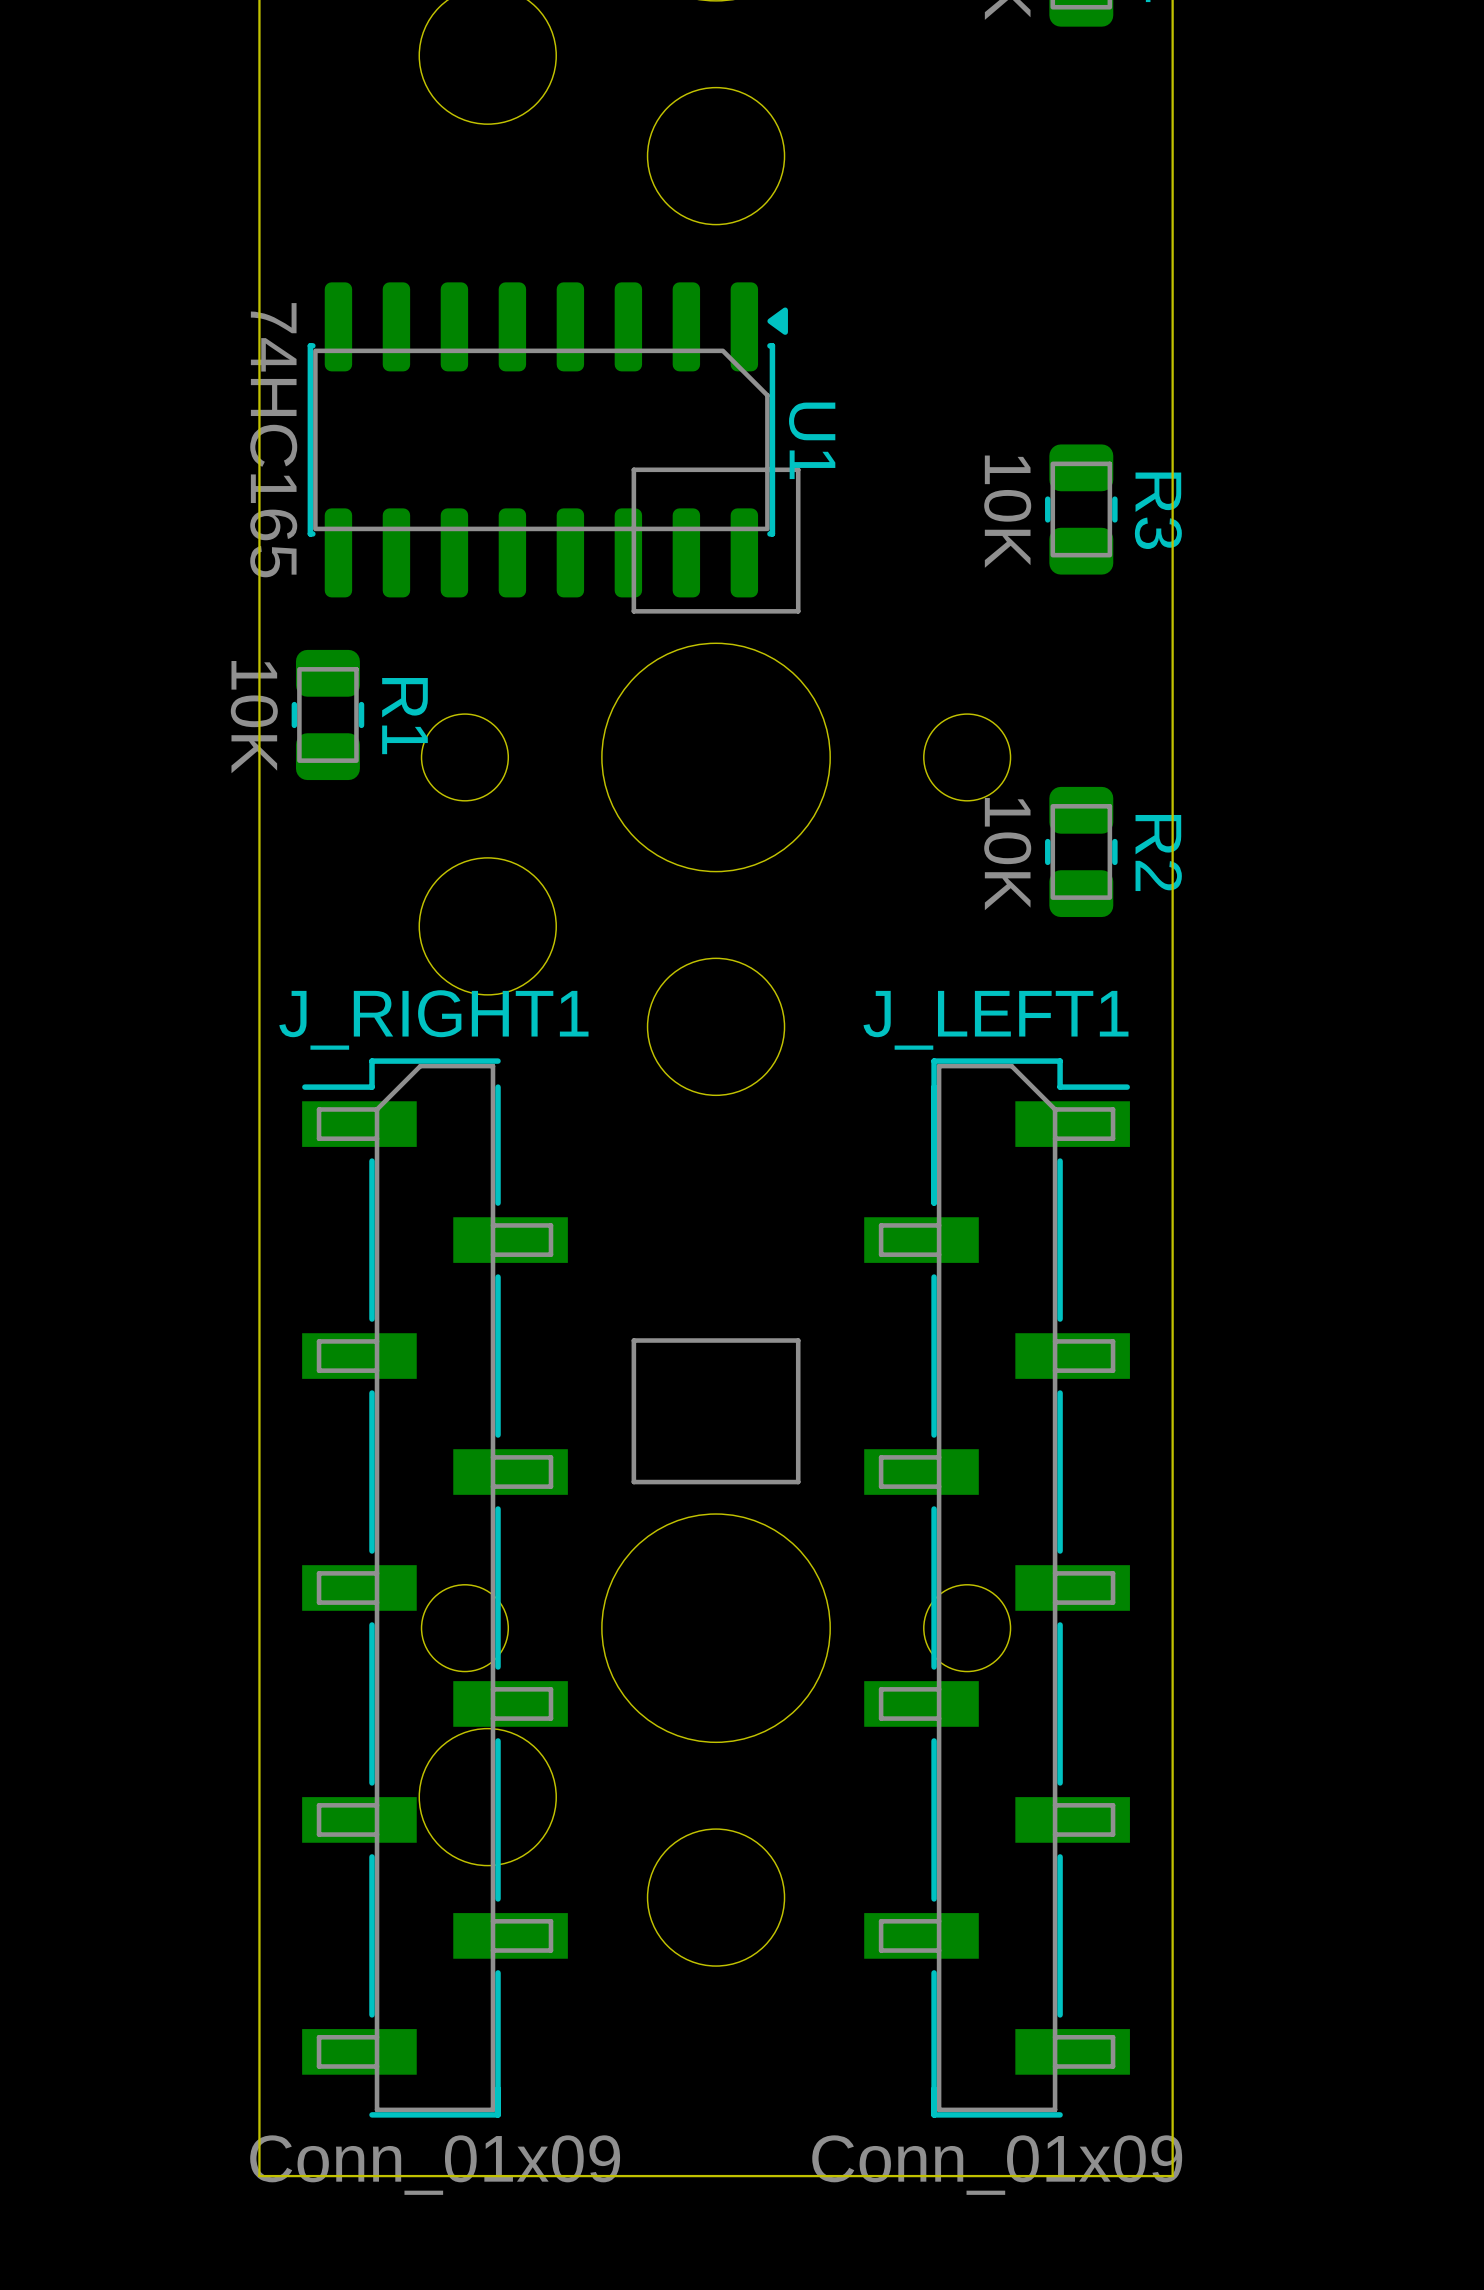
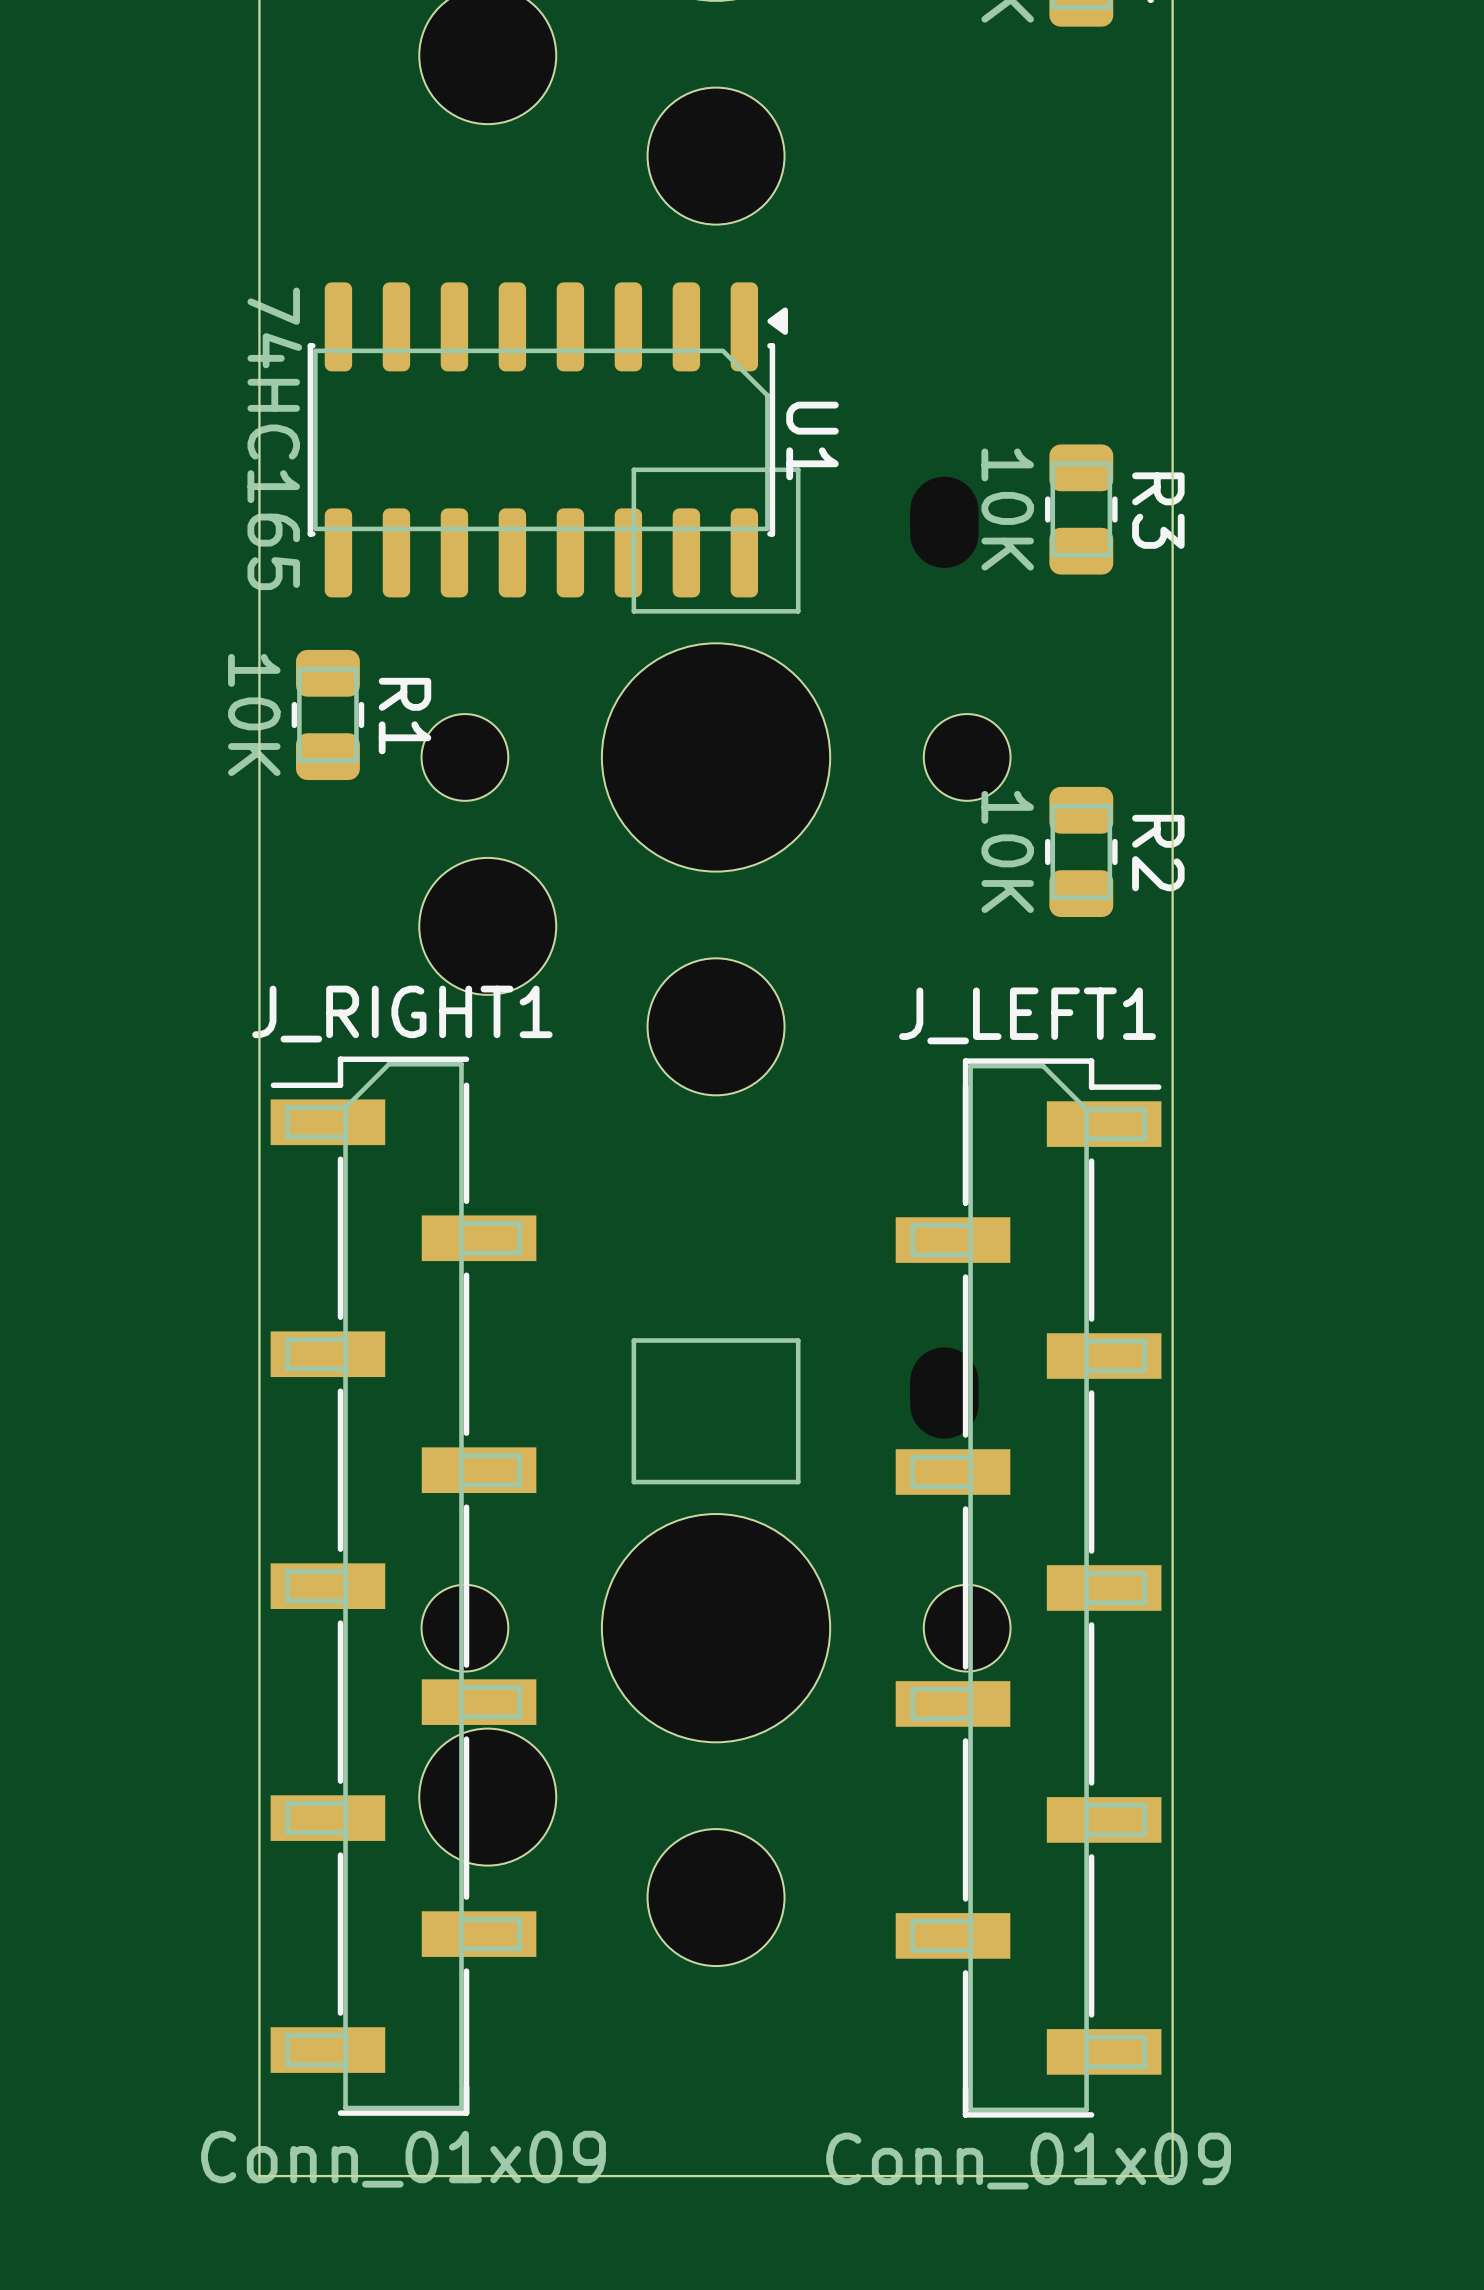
J_RIGHT1 position: (435, 1587) -> (403, 1586)
J_LEFT1 position: (997, 1587) -> (1028, 1587)

